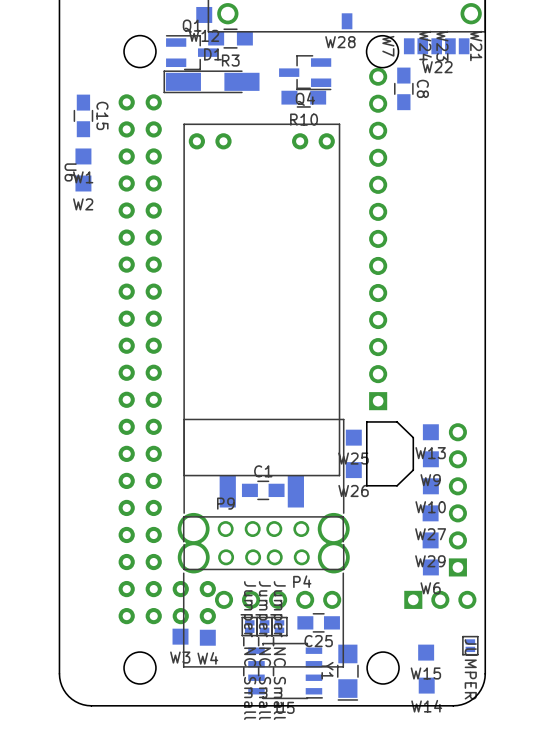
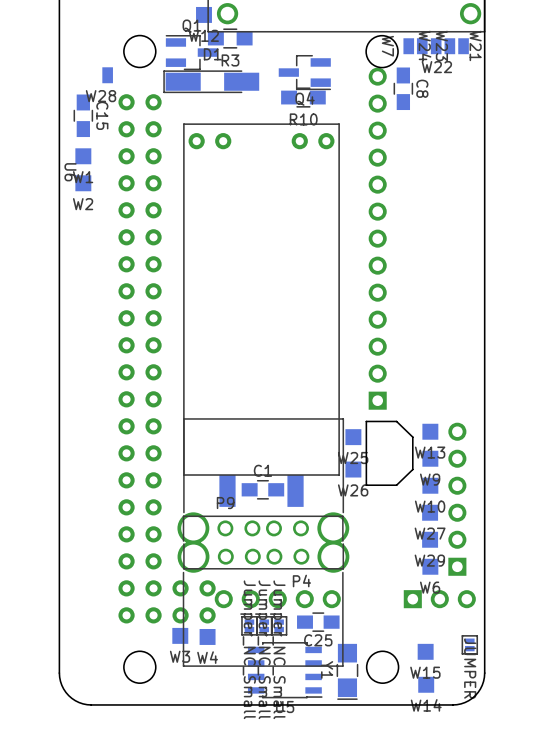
W28 position: (347, 21) -> (107, 75)

